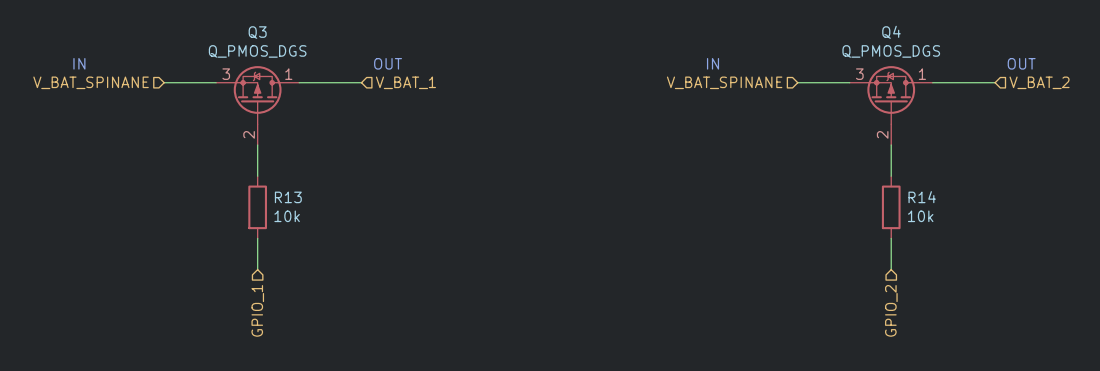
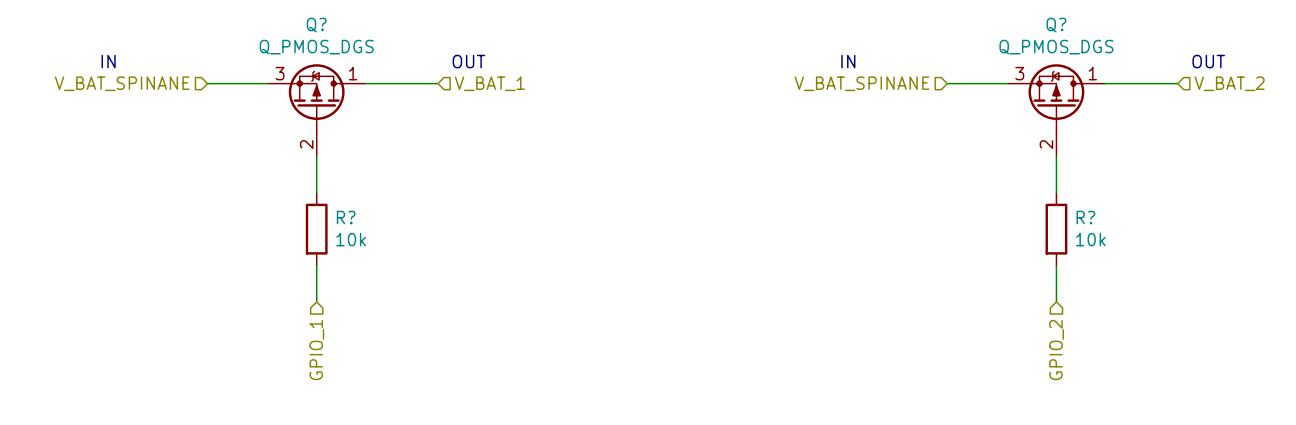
Q3 name: Q3 (257, 32) -> Q? (316, 25)
Q4 name: Q4 (891, 32) -> Q? (1056, 25)
R13 name: R13 (288, 197) -> R? (346, 217)
R14 name: R14 (922, 197) -> R? (1085, 217)

